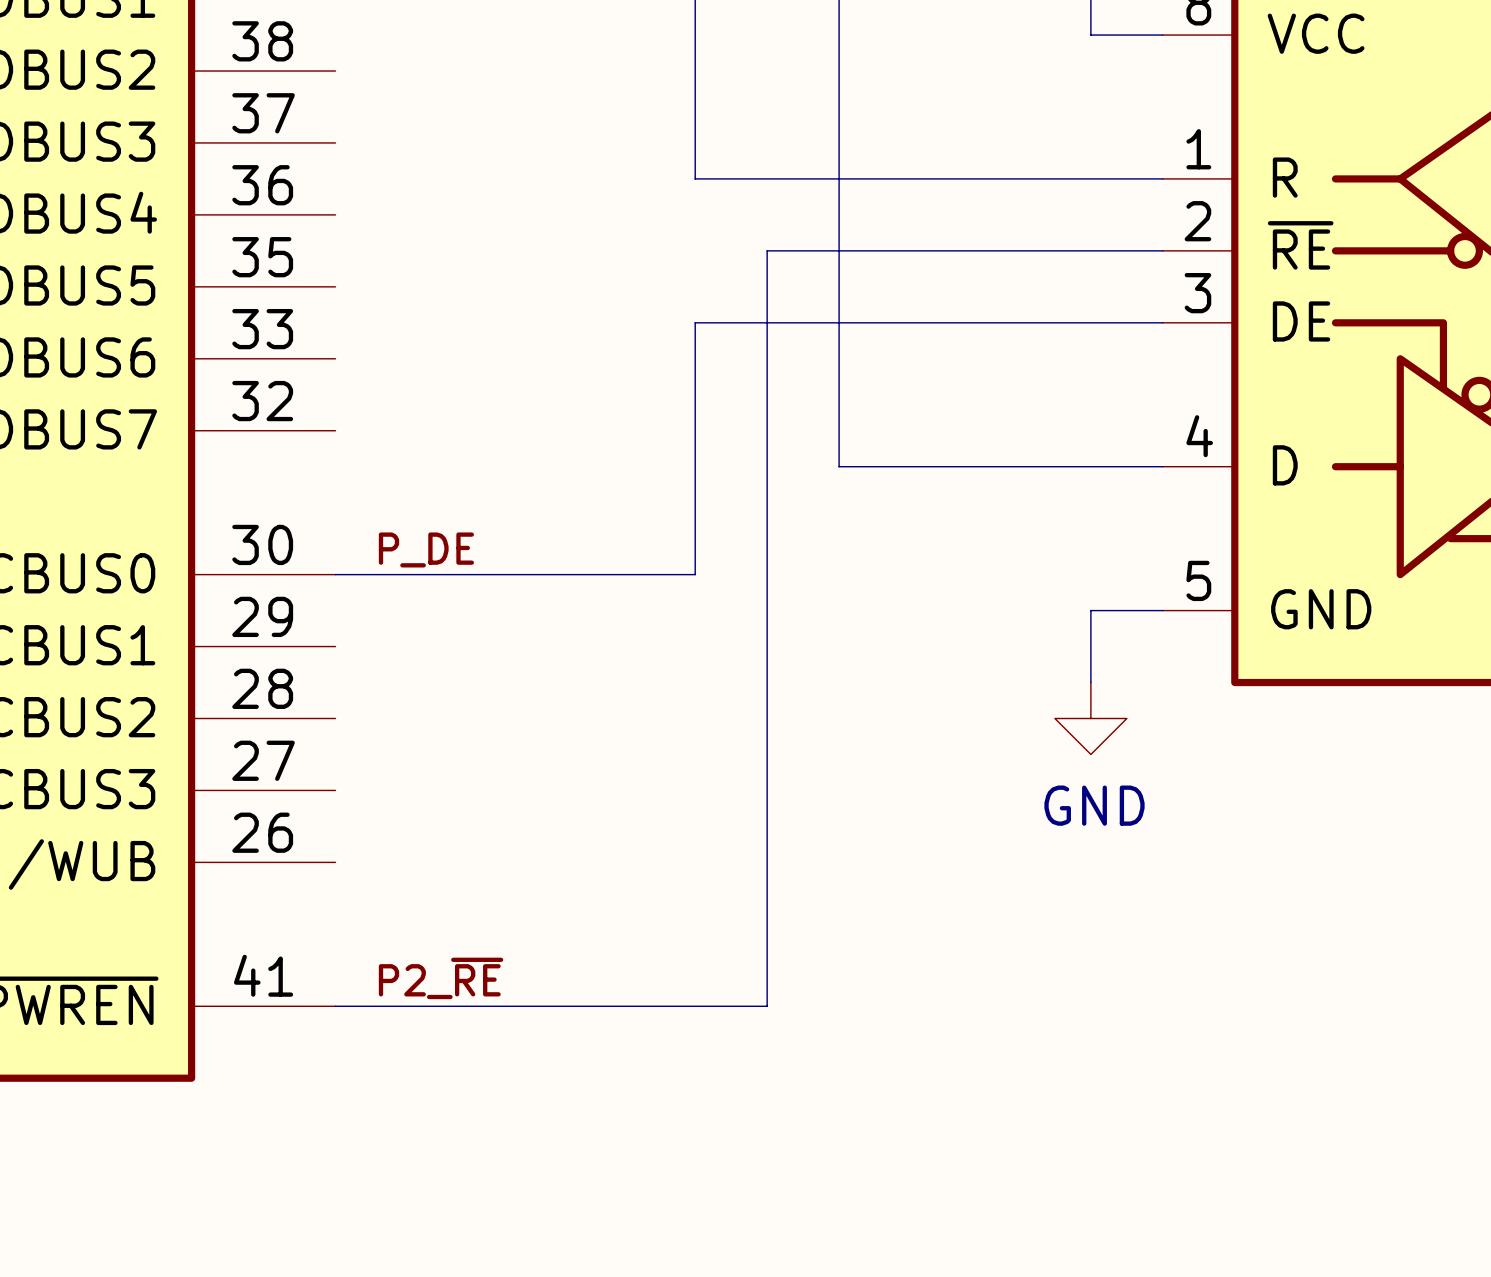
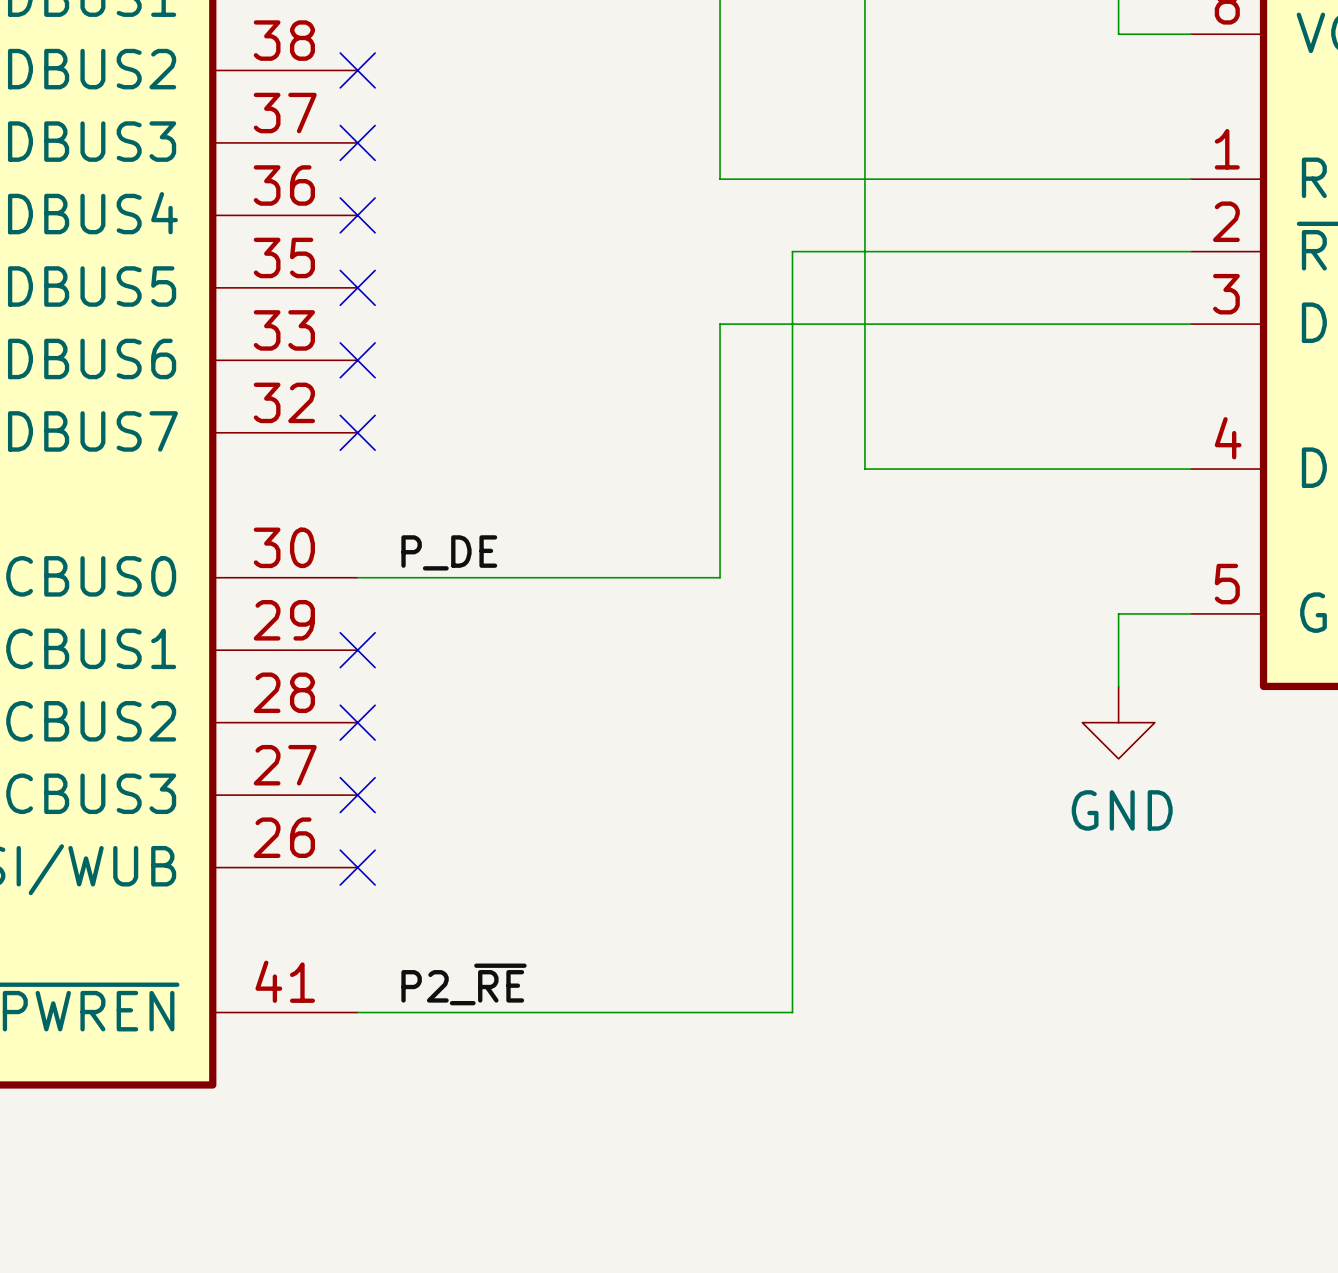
no-connect mark: none -> (357, 70)
no-connect mark: none -> (357, 142)
no-connect mark: none -> (357, 215)
no-connect mark: none -> (357, 287)
no-connect mark: none -> (357, 360)
no-connect mark: none -> (357, 432)
no-connect mark: none -> (357, 650)
no-connect mark: none -> (357, 722)
no-connect mark: none -> (357, 795)
no-connect mark: none -> (357, 867)

